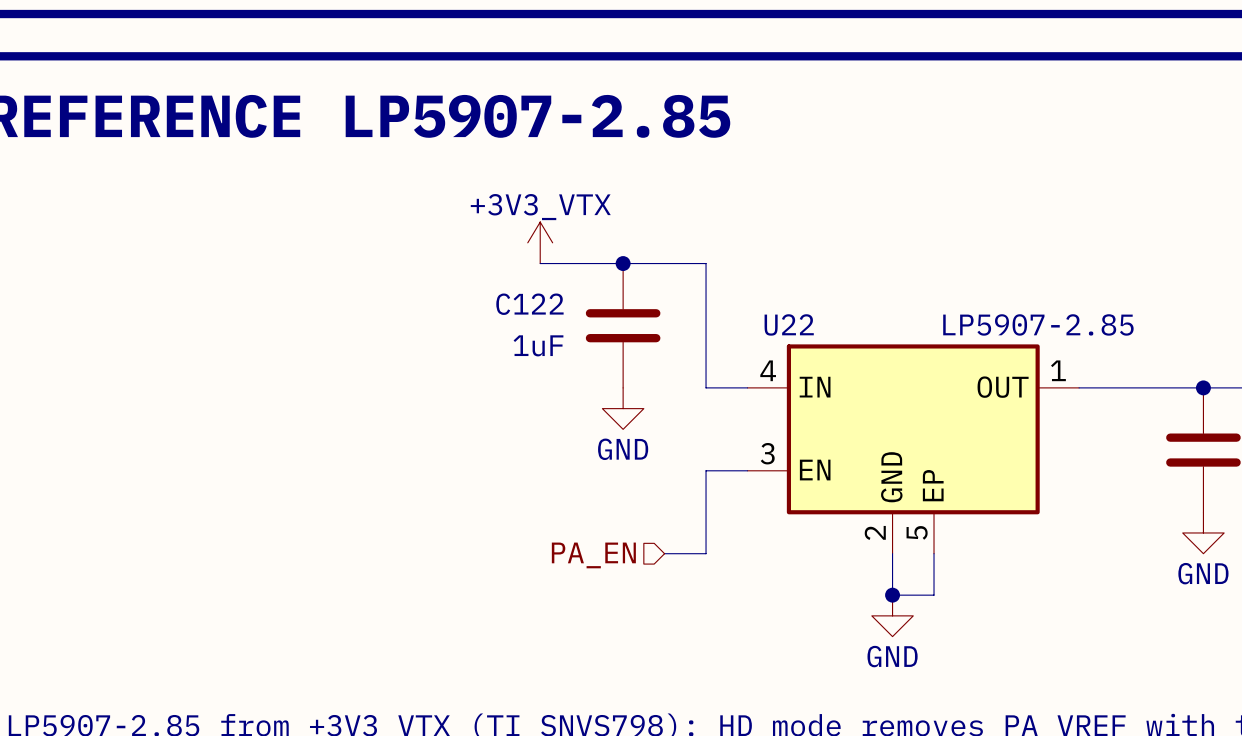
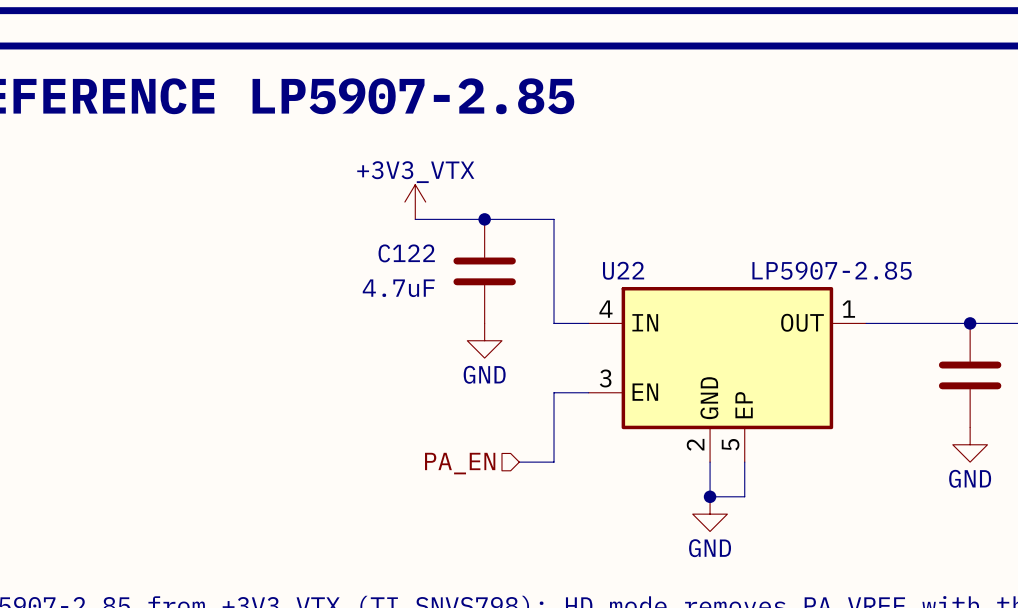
C122 value: 1uF (538, 345) -> 4.7uF (398, 288)

